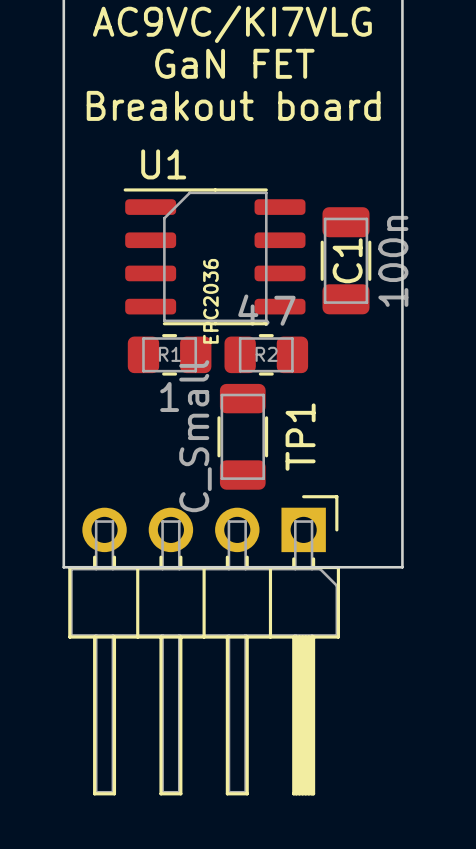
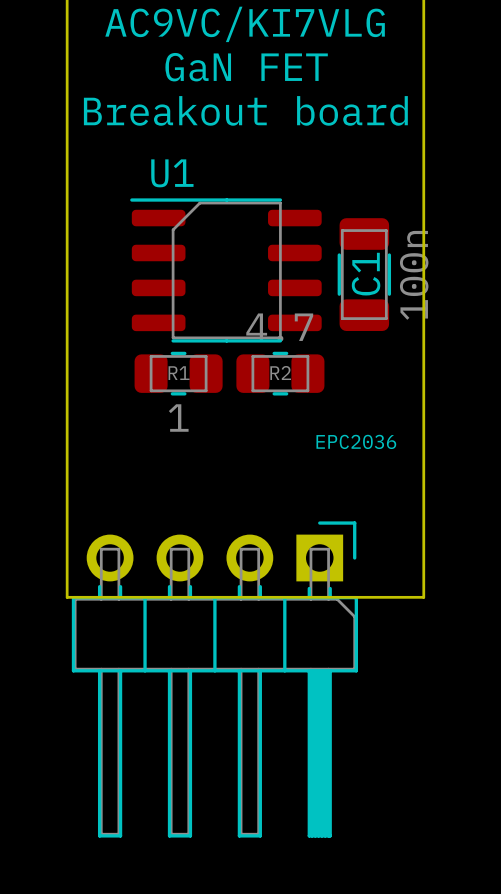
part position: (210, 301) -> (356, 441)
part value rotation: 0° (210, 301) -> 90° clockwise (356, 441)
TP1: C_Small (242, 436) -> none

